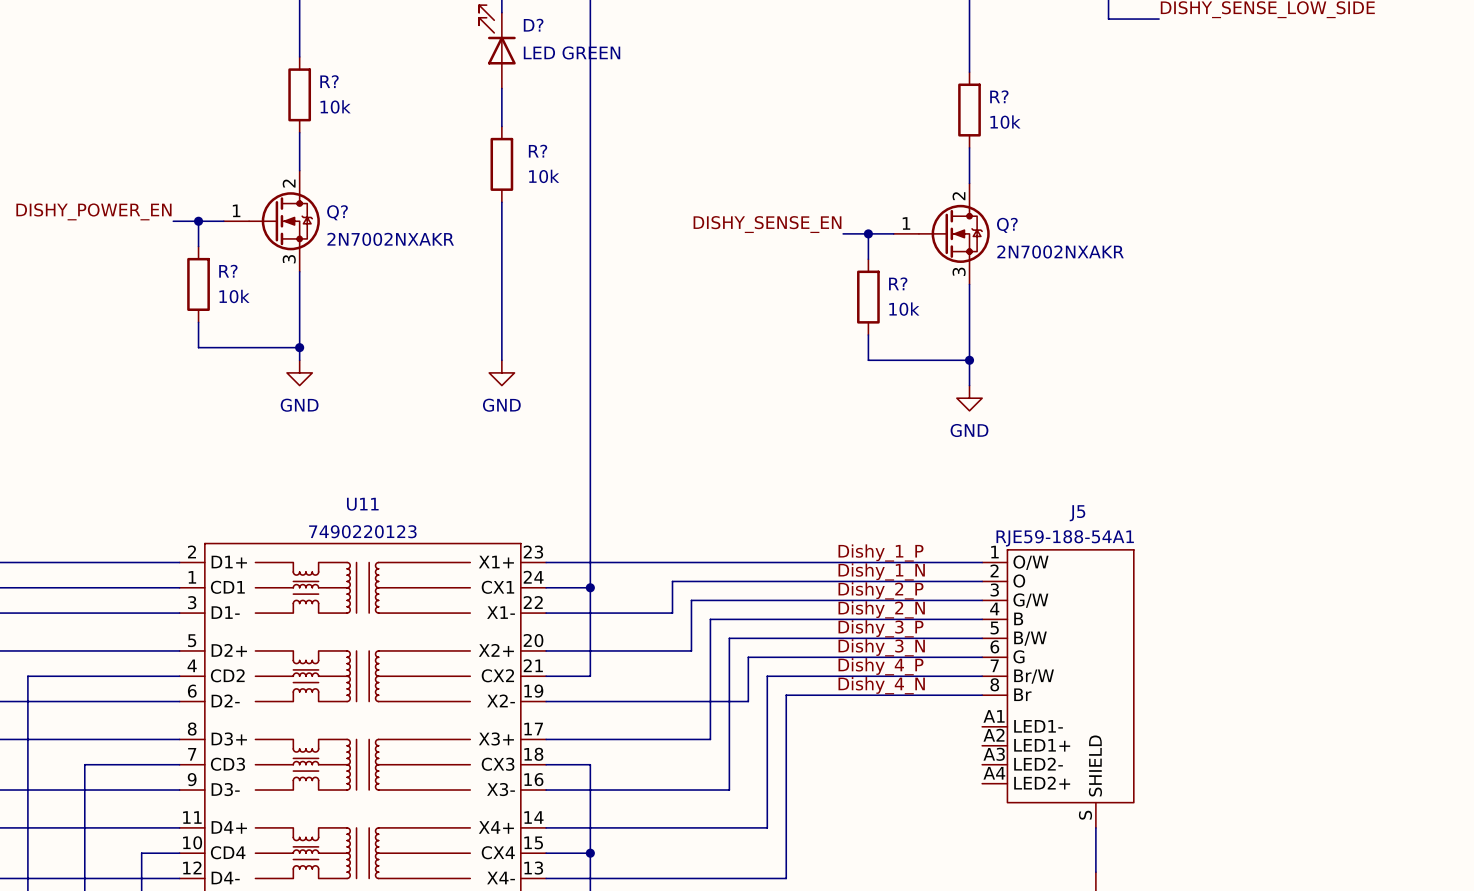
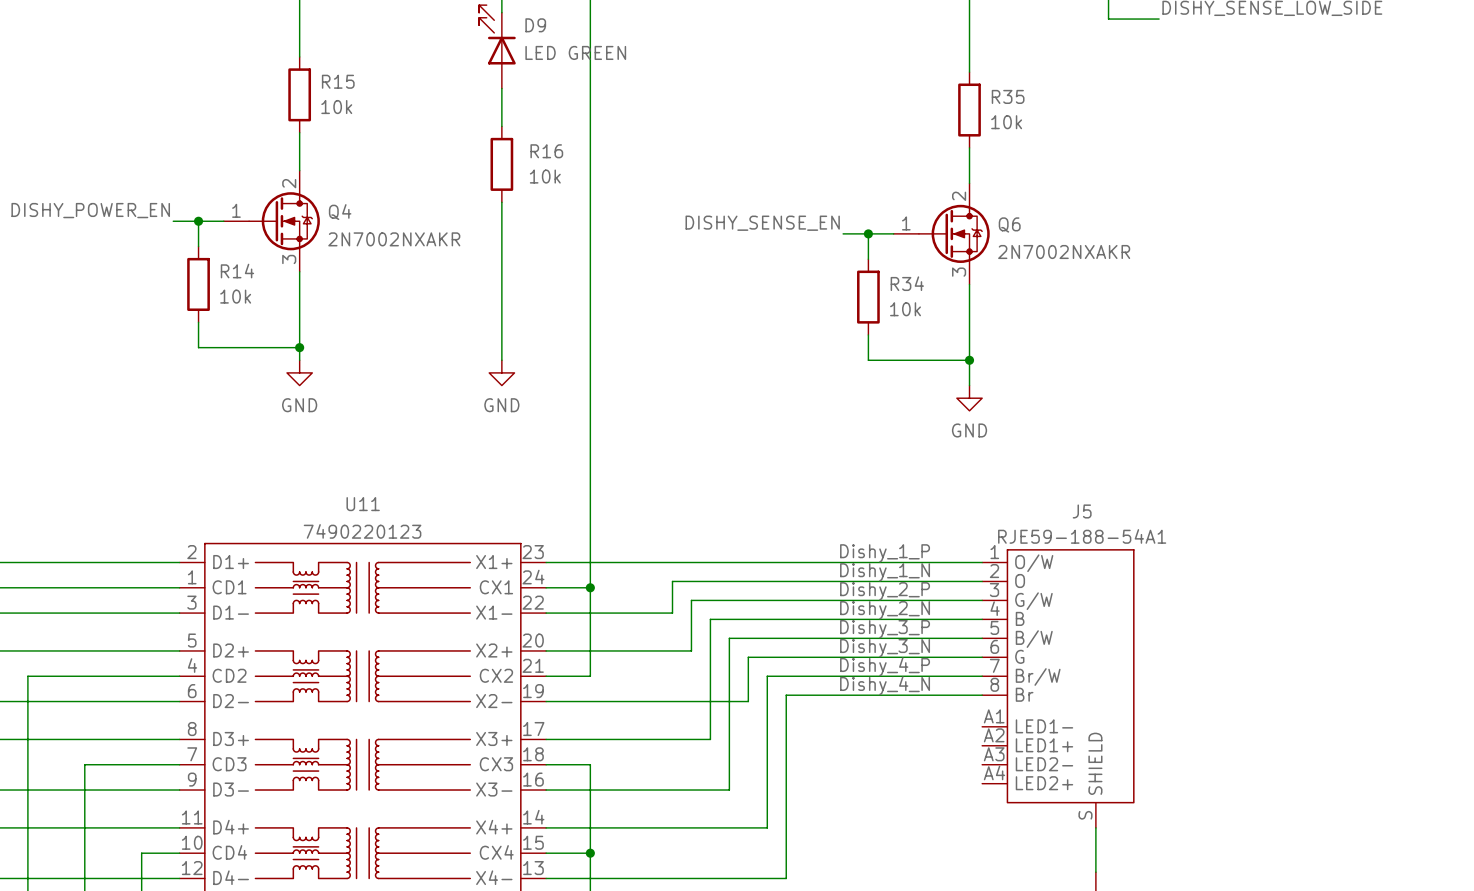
D? name: D? (533, 25) -> D9 (535, 25)
R? name: R? (329, 81) -> R15 (338, 81)
R? name: R? (999, 96) -> R35 (1008, 96)
R? name: R? (538, 151) -> R16 (546, 151)
Q? name: Q? (337, 212) -> Q4 (340, 212)
Q? name: Q? (1007, 225) -> Q6 (1009, 224)
R? name: R? (228, 271) -> R14 (237, 271)
R? name: R? (898, 283) -> R34 (907, 283)

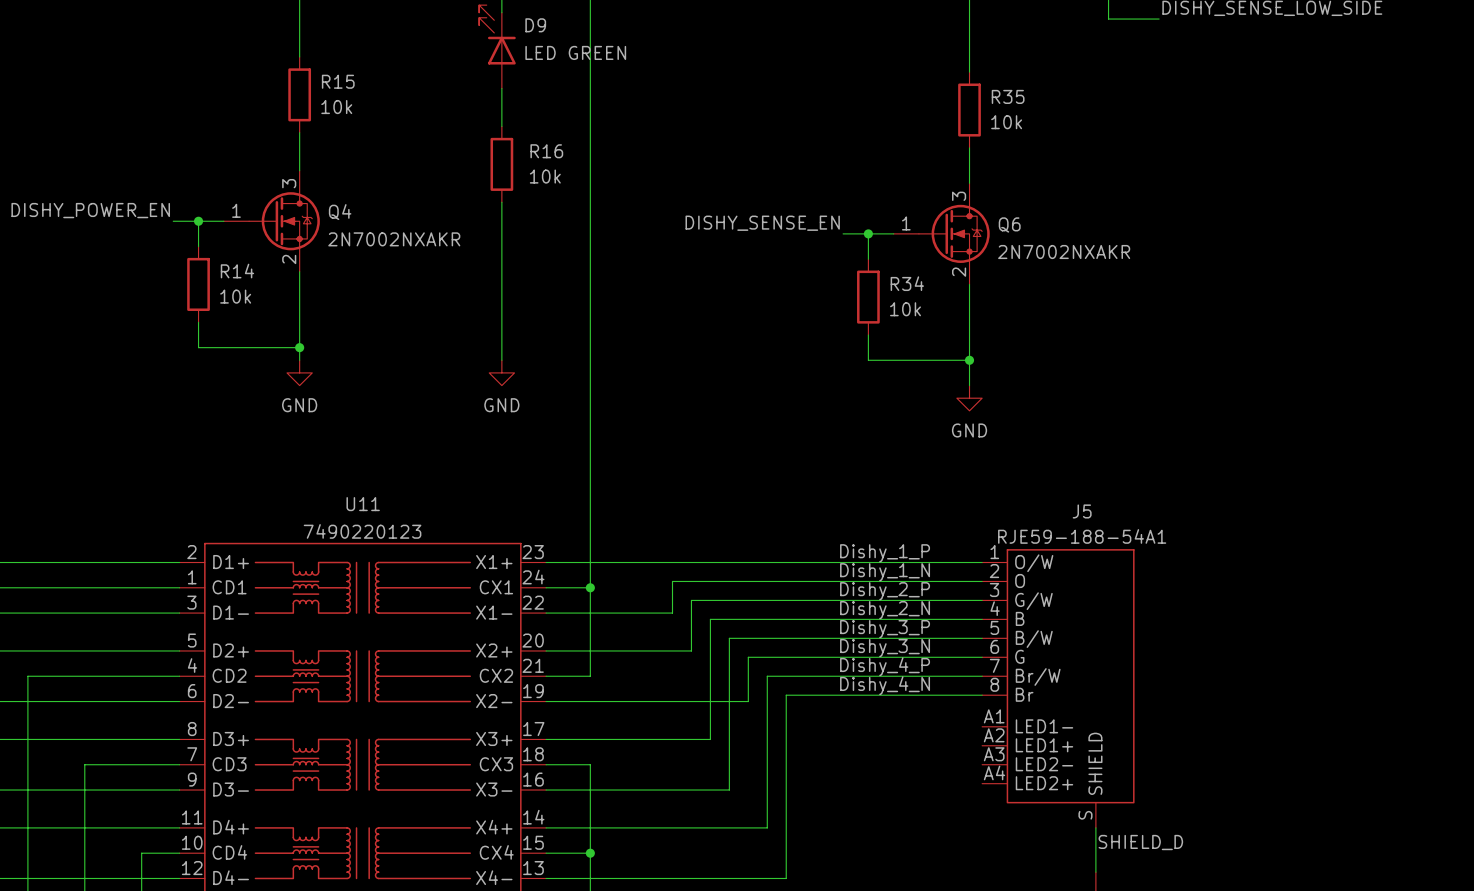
Q4 pin number: 2 (289, 183) -> 3 (289, 183)
Q6 pin number: 2 (959, 196) -> 3 (959, 196)
Q4 pin number: 3 (289, 259) -> 2 (289, 259)
Q6 pin number: 3 (959, 272) -> 2 (959, 272)
label: none -> SHIELD_D (1140, 842)

